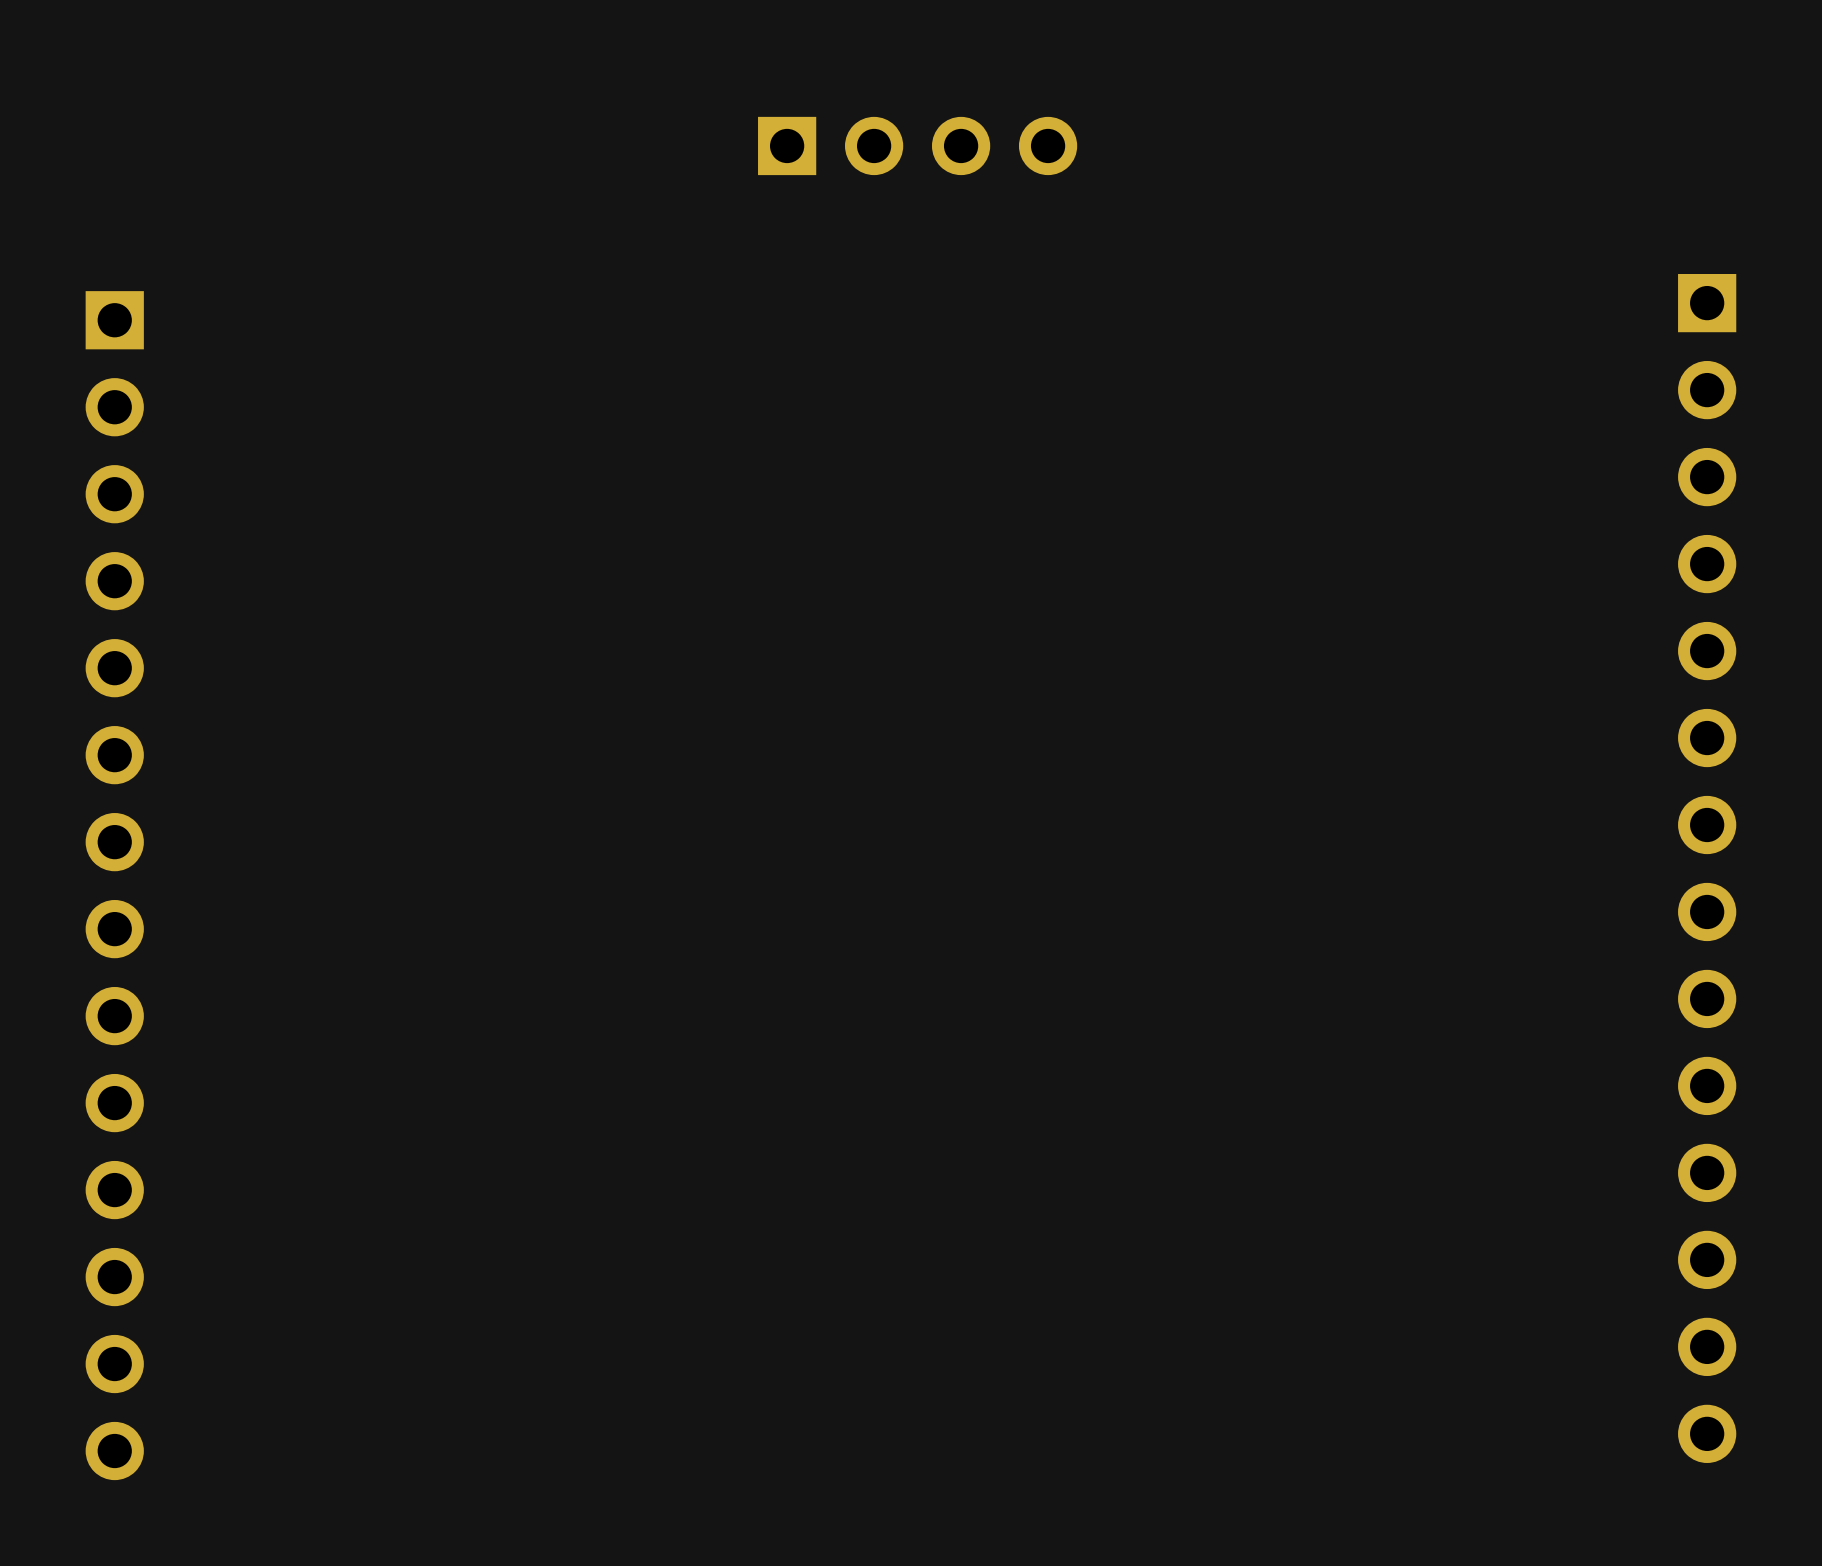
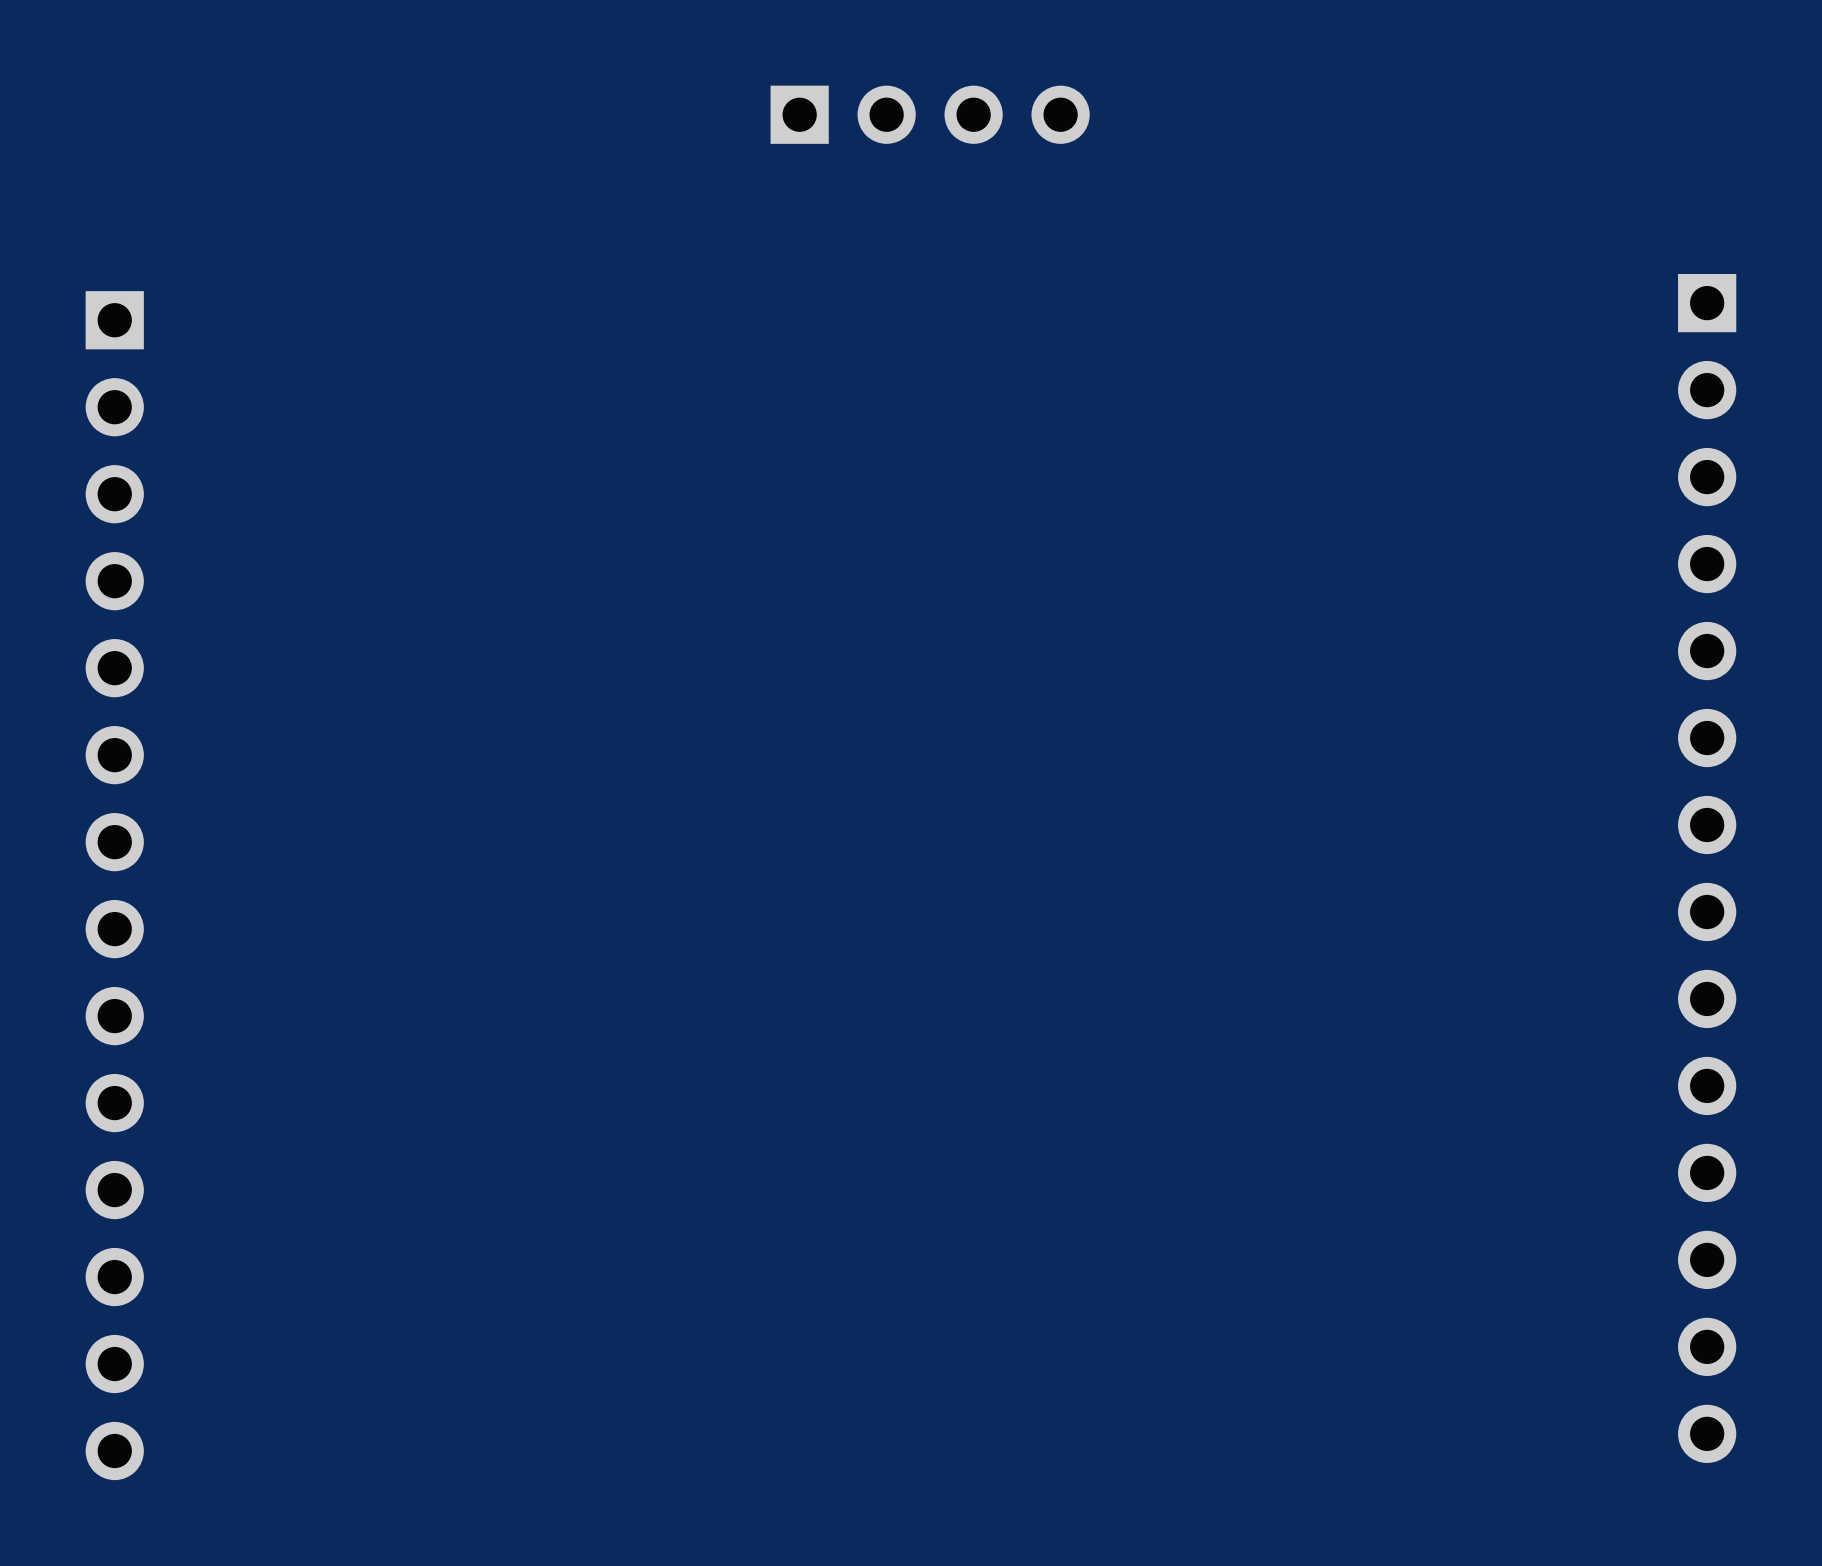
part position: (917, 145) -> (930, 114)

